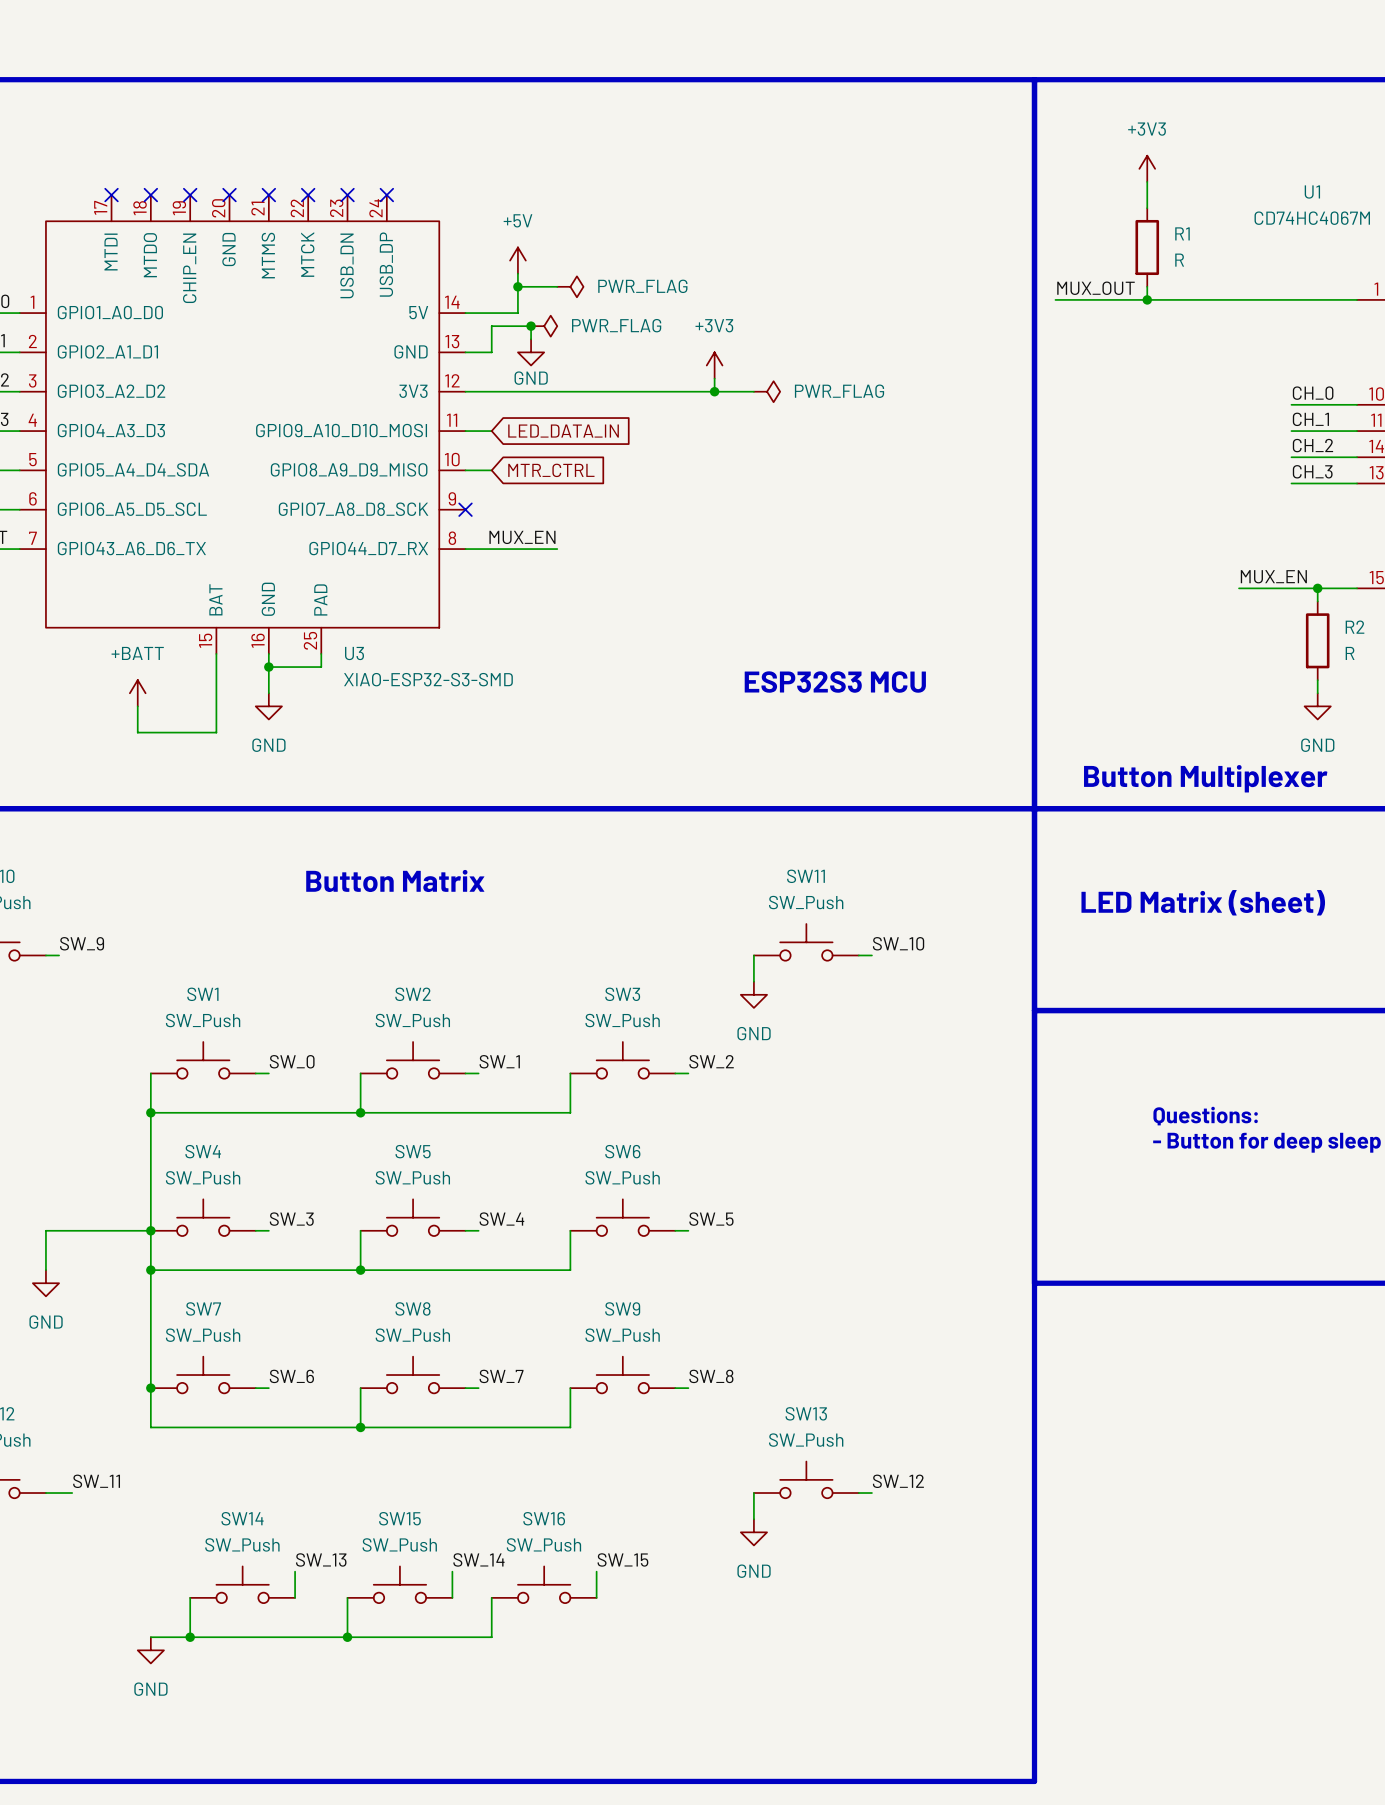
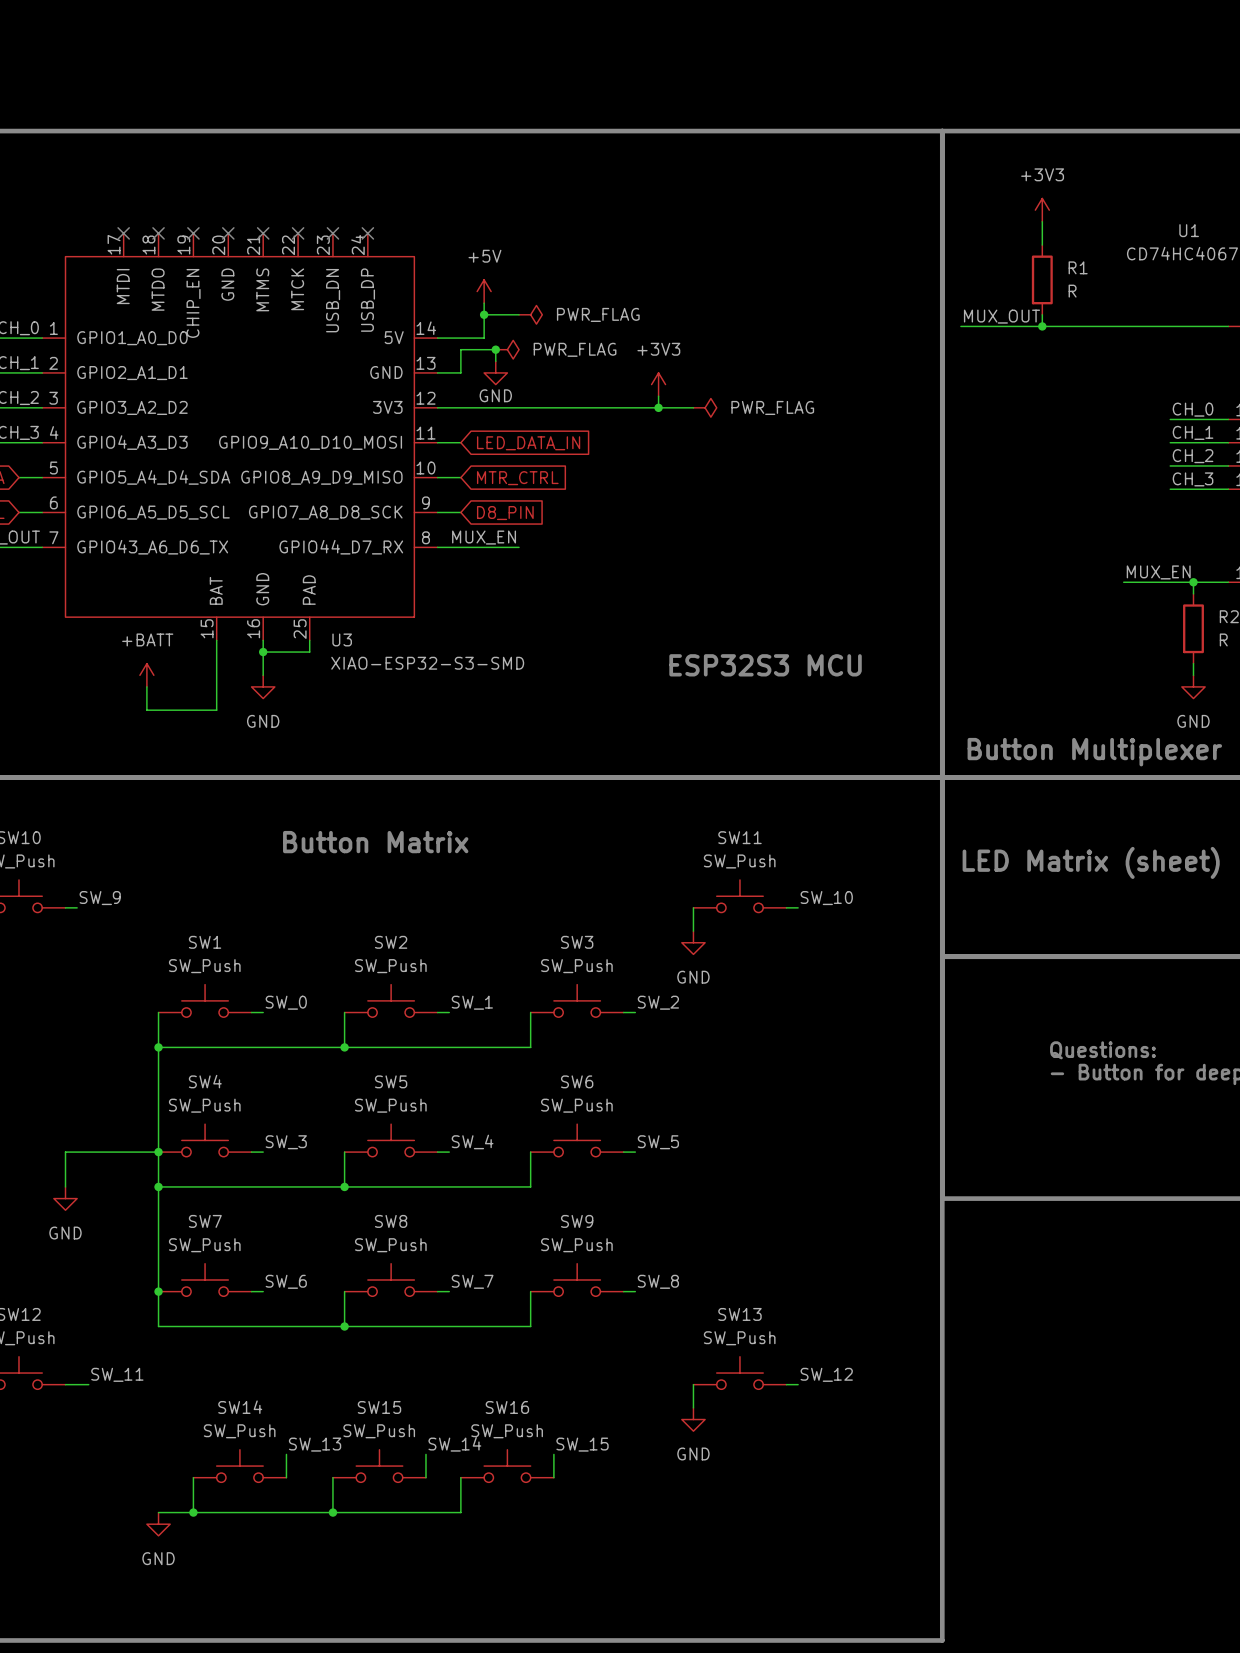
wire: none -> (437, 512) (460, 512)
no-connect mark: (465, 509) -> none
global label: none -> D8_PIN (505, 513)

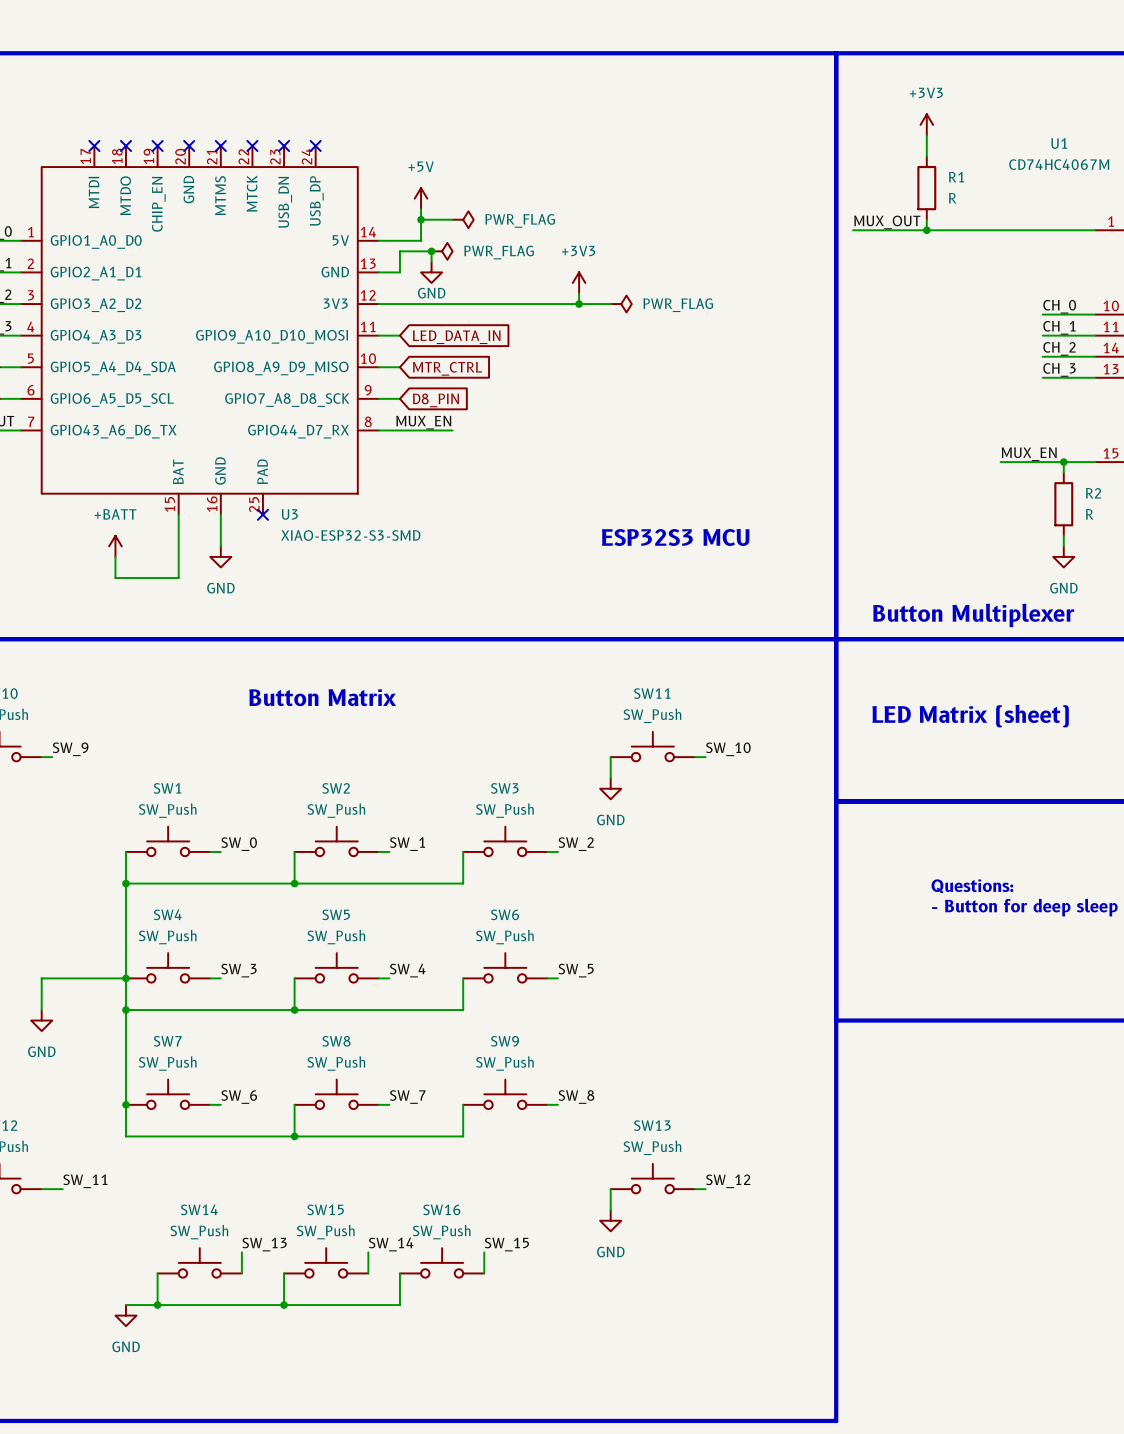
wire: (309, 640) (309, 652) (263, 652) -> none
no-connect mark: none -> (262, 514)
junction: (263, 652) -> none

